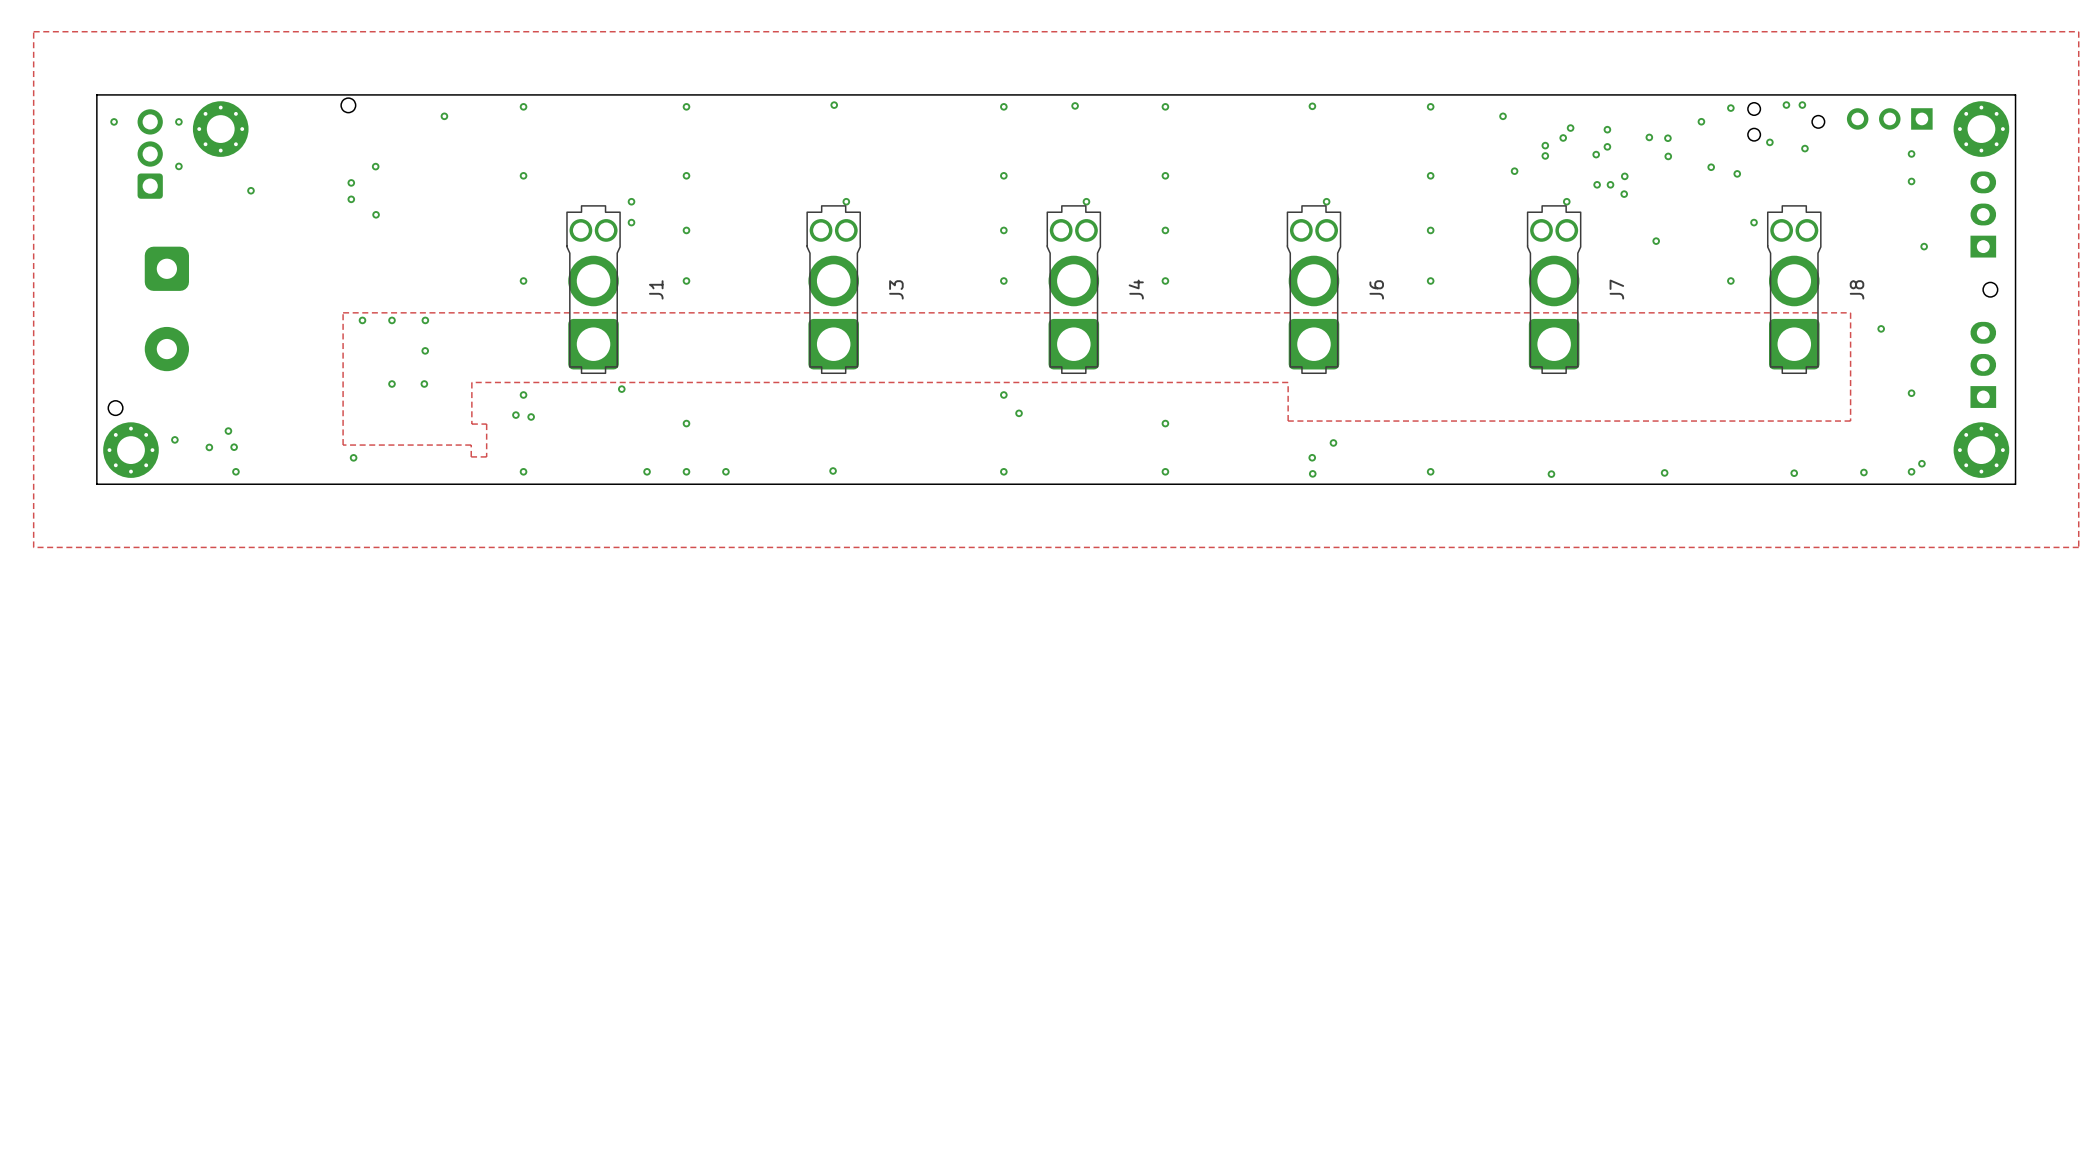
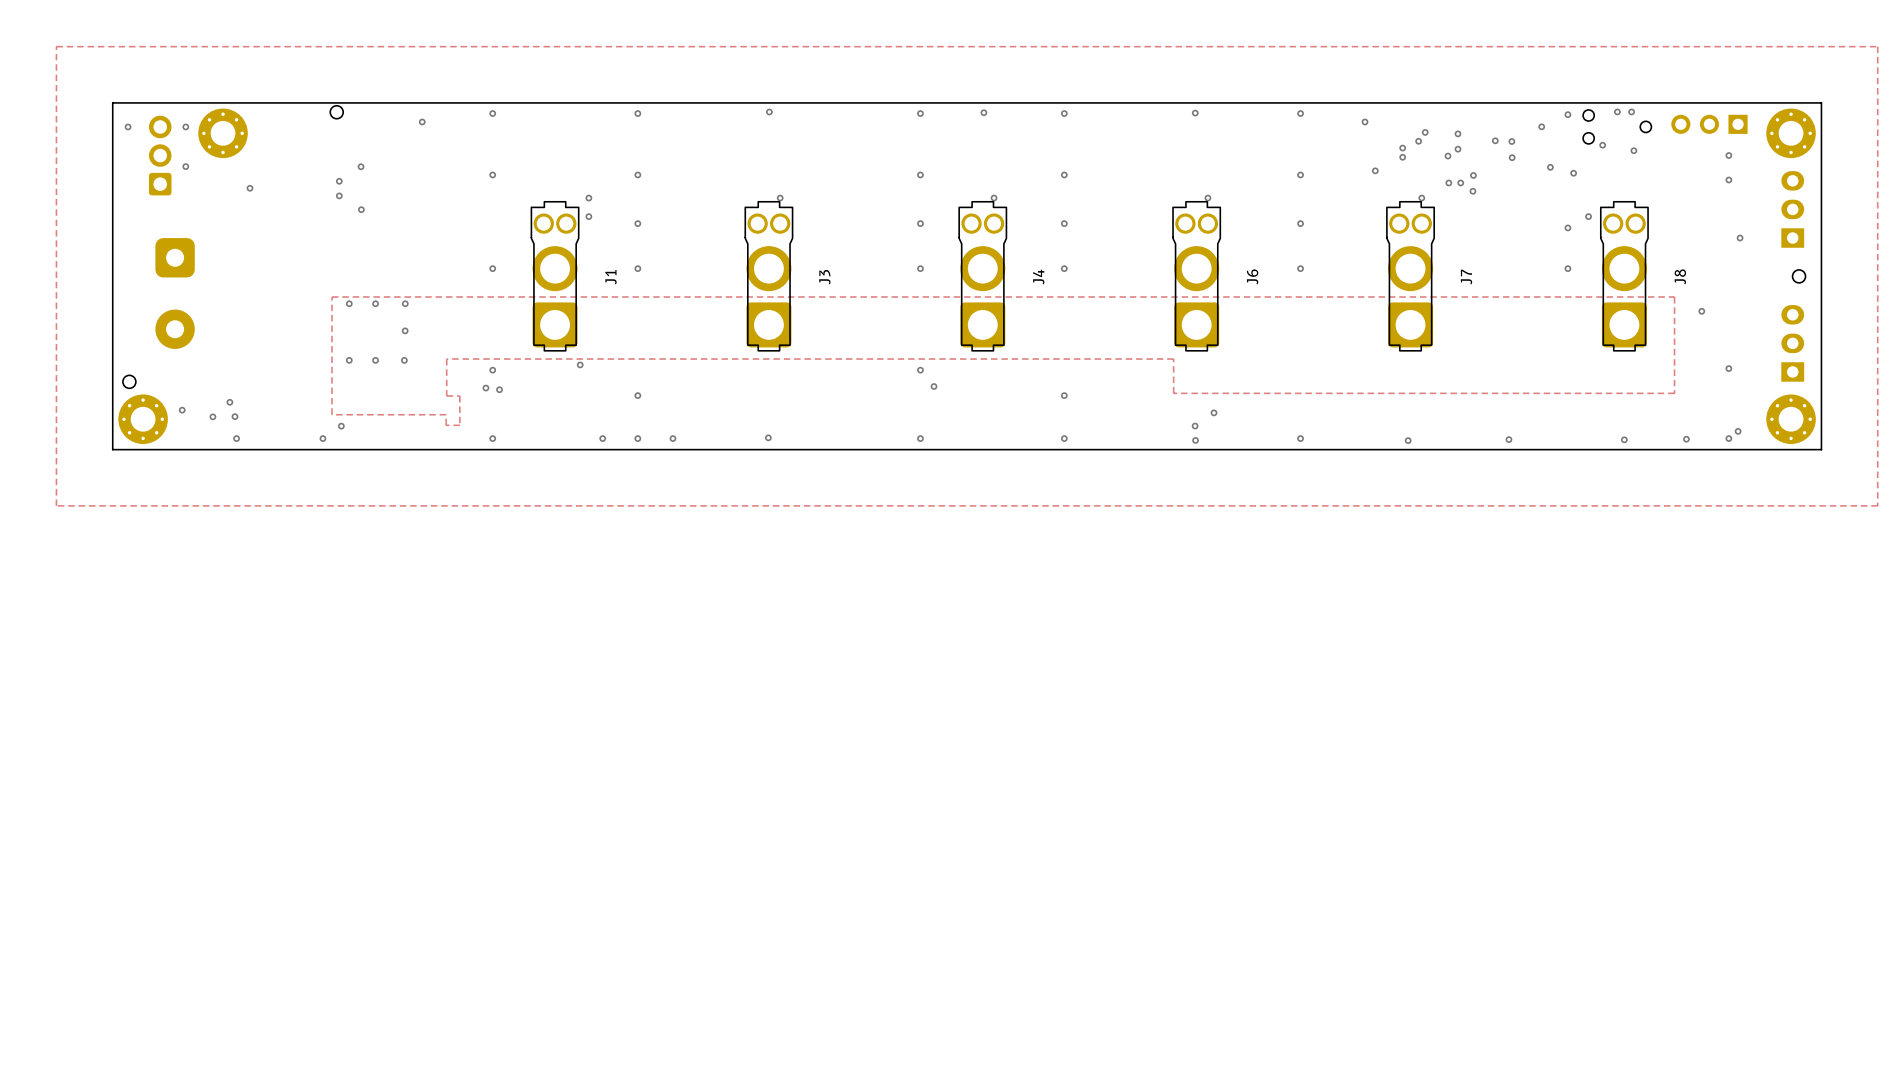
via position: (1656, 241) -> (1567, 227)
via: none -> (349, 360)
via: none -> (322, 438)

